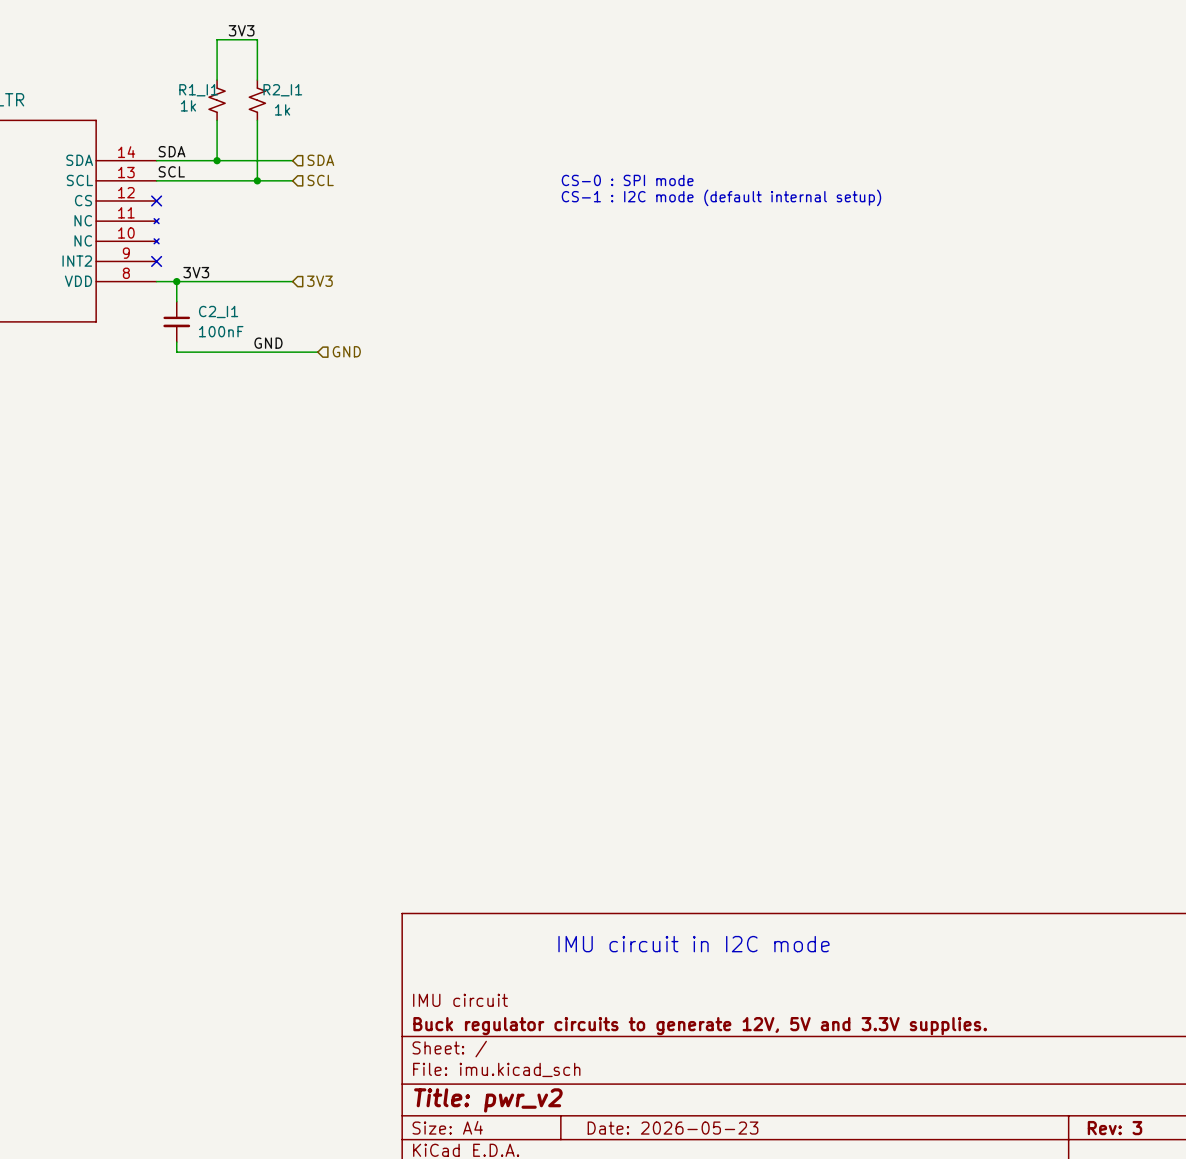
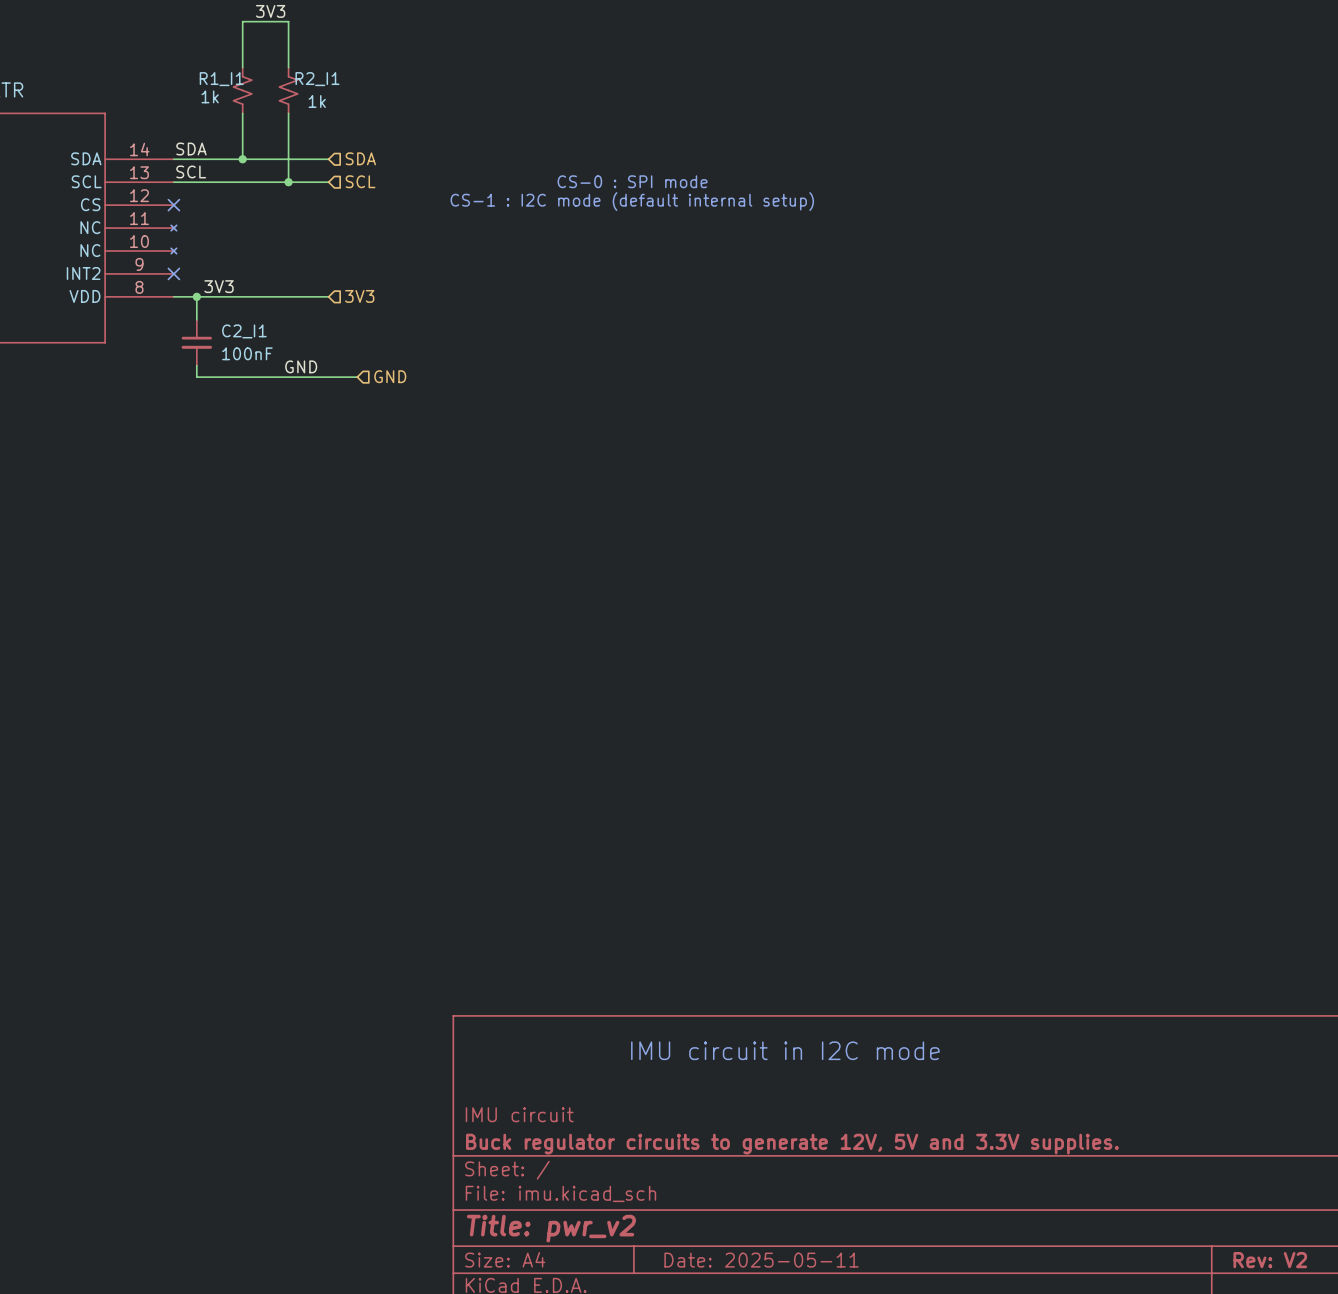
text position: CS-0 : SPI mode (627, 180) -> CS-0 : SPI mode (632, 181)
text position: CS-1 : I2C mode (default internal setup) (721, 197) -> CS-1 : I2C mode (default internal setup) (632, 201)
title block: Date: 2026-05-23 (673, 1128) -> Date: 2025-05-11 (761, 1260)
title block: Rev: 3 (1114, 1128) -> Rev: V2 (1270, 1260)

